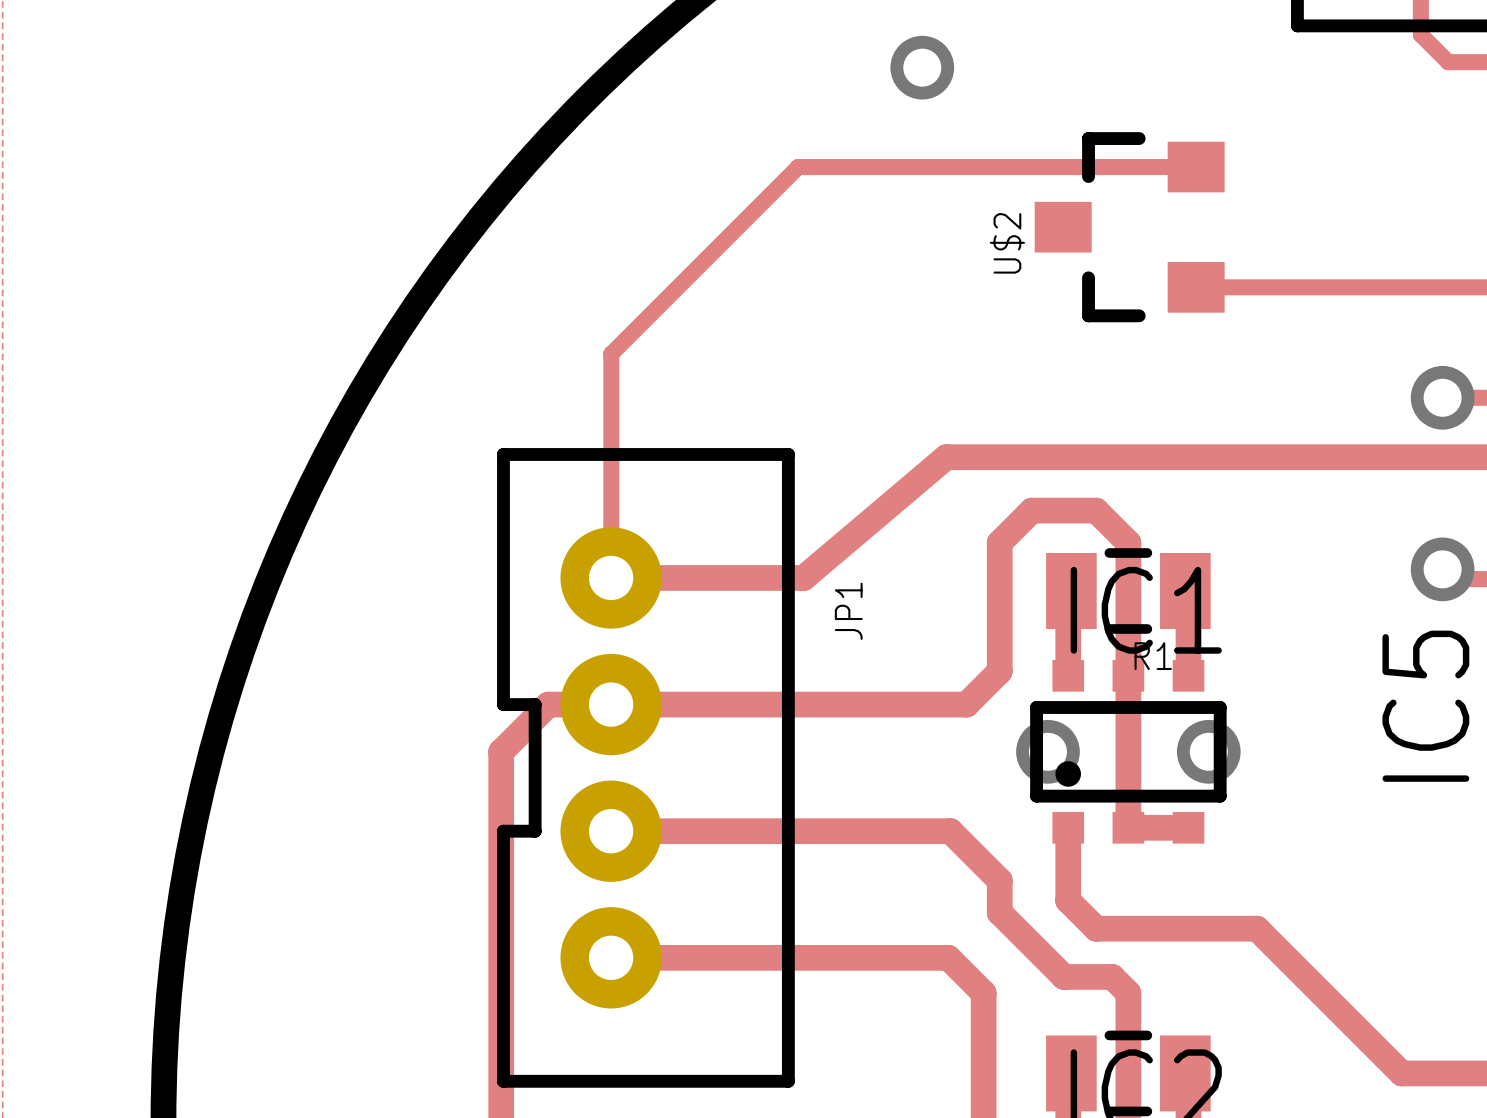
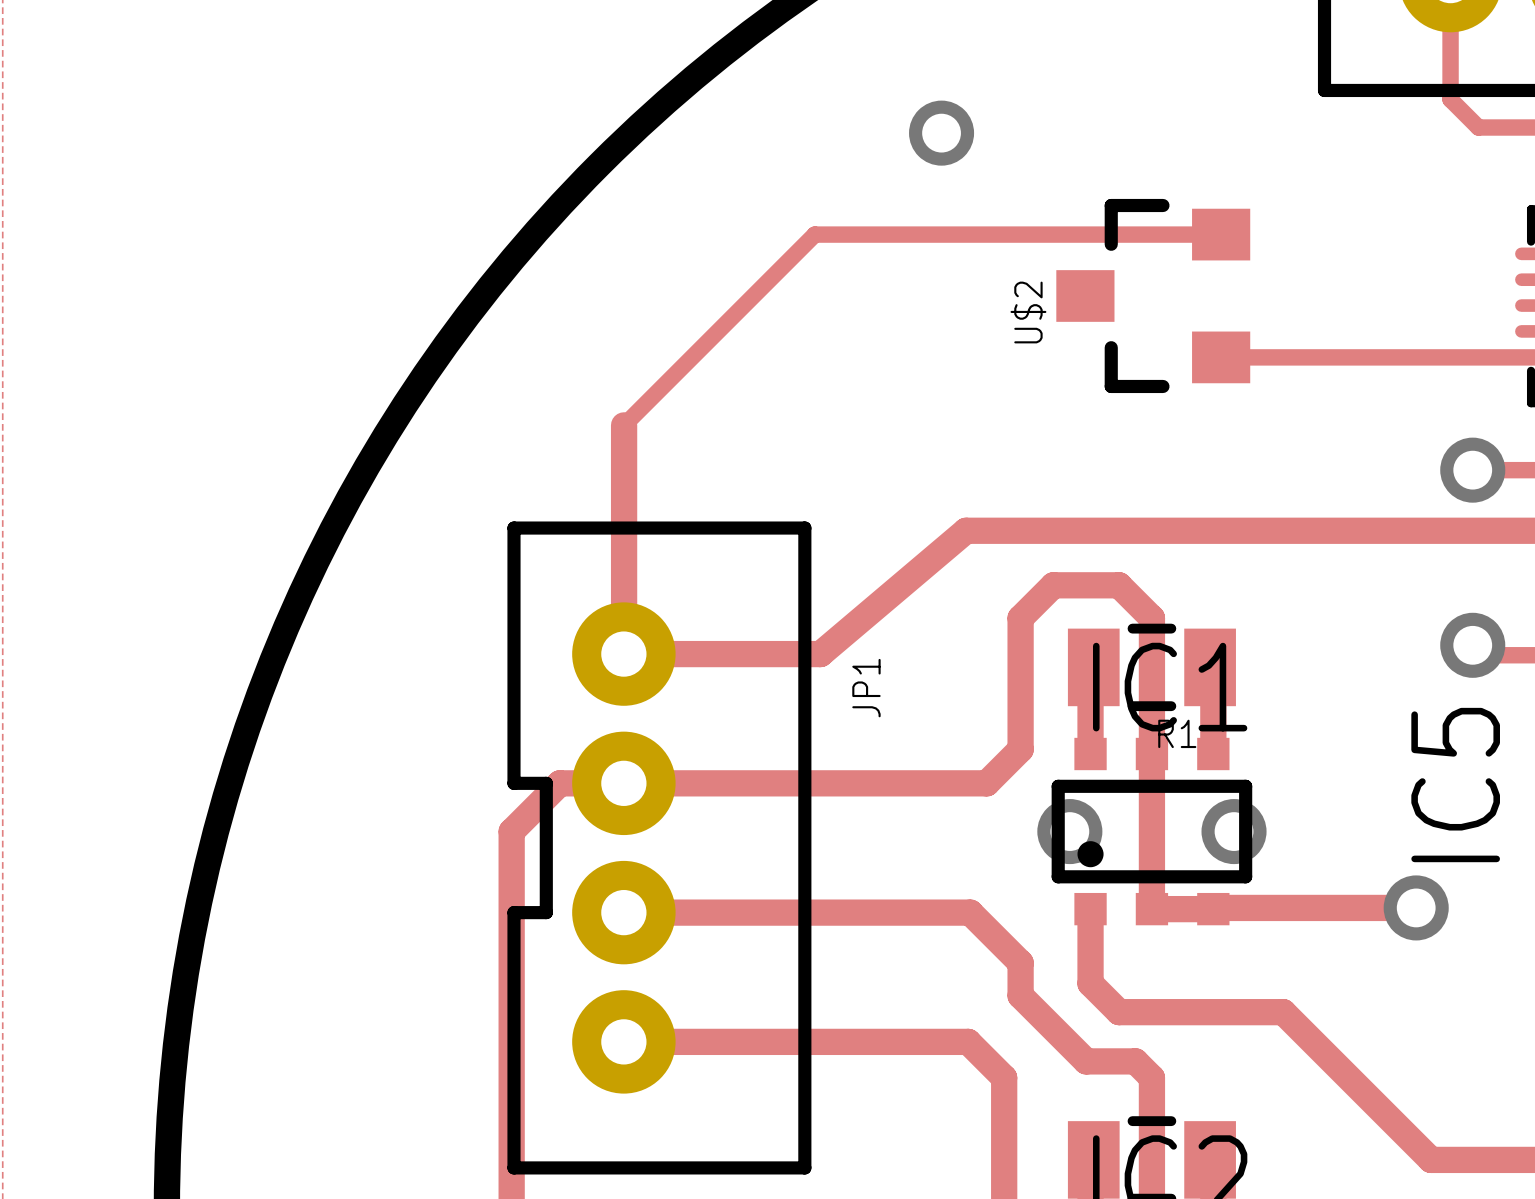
track width: thin (611, 353) (611, 577) -> thick (624, 425) (624, 653)
track: none -> (1416, 907) (1213, 909)
via: none -> (1416, 907)

